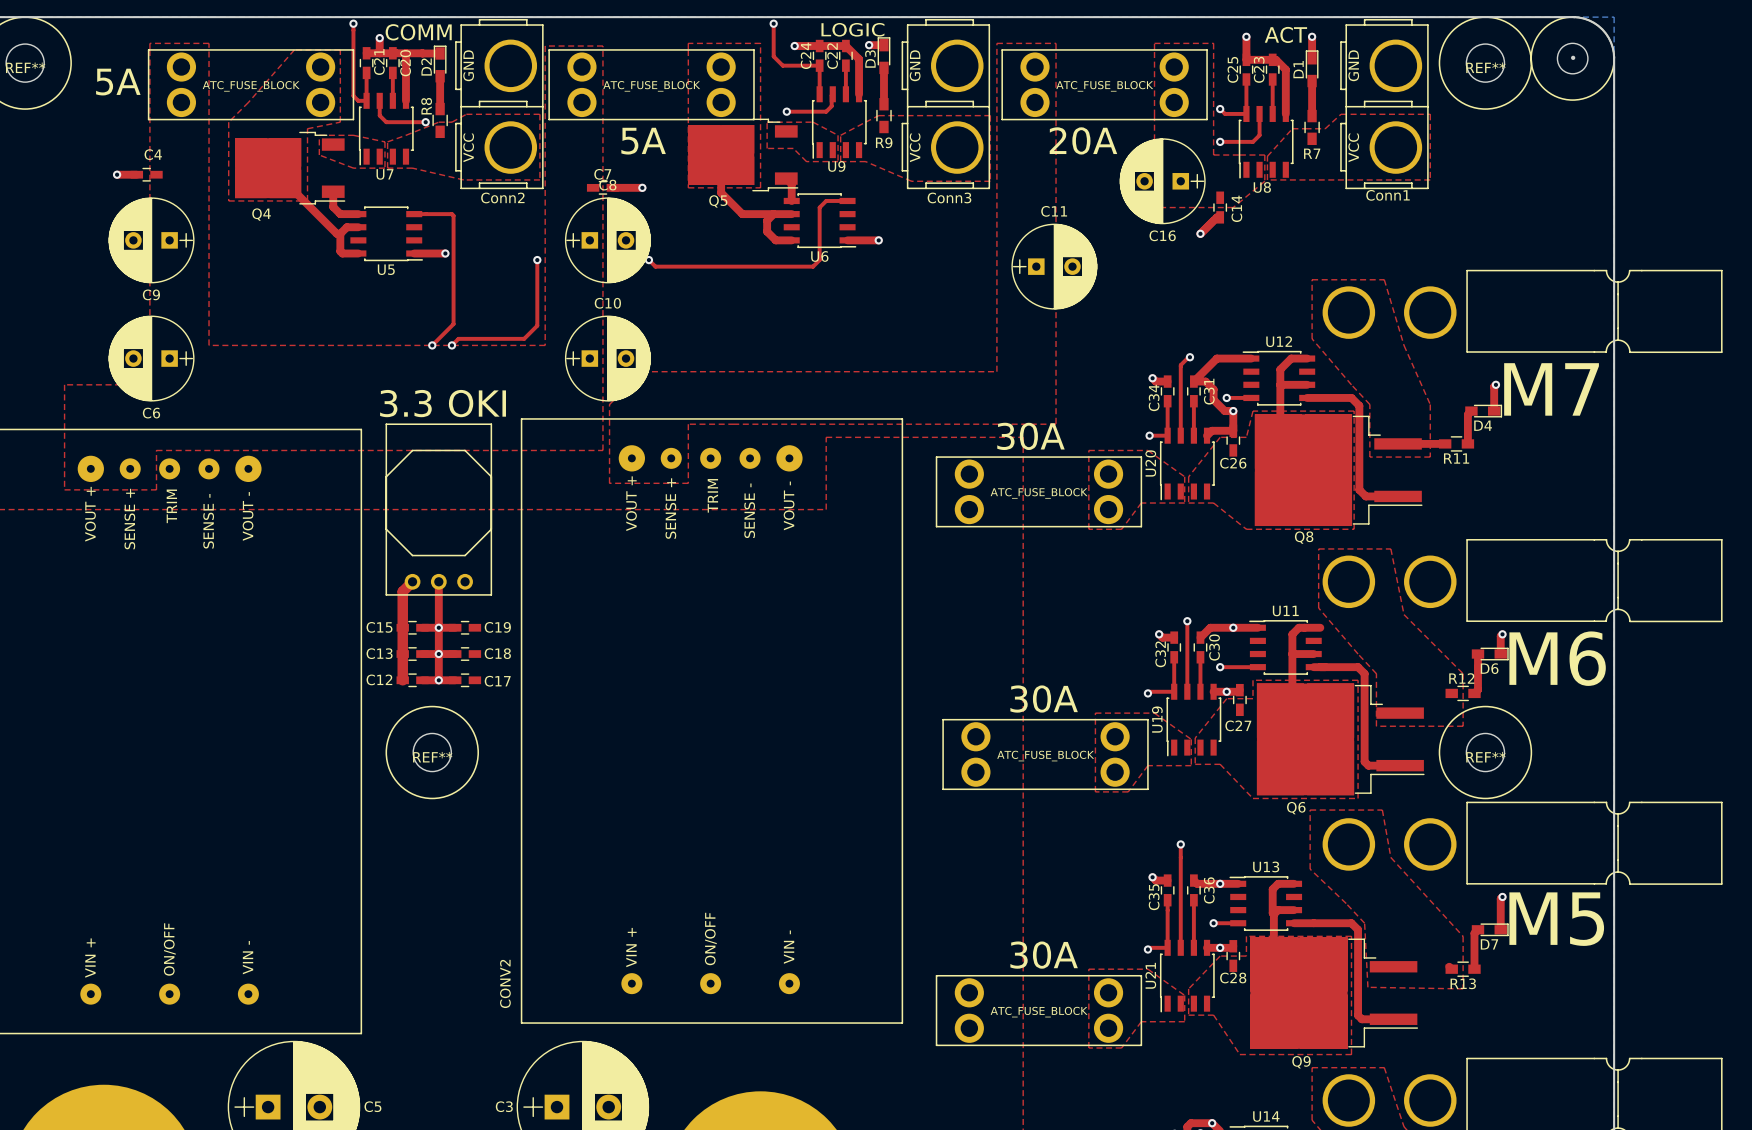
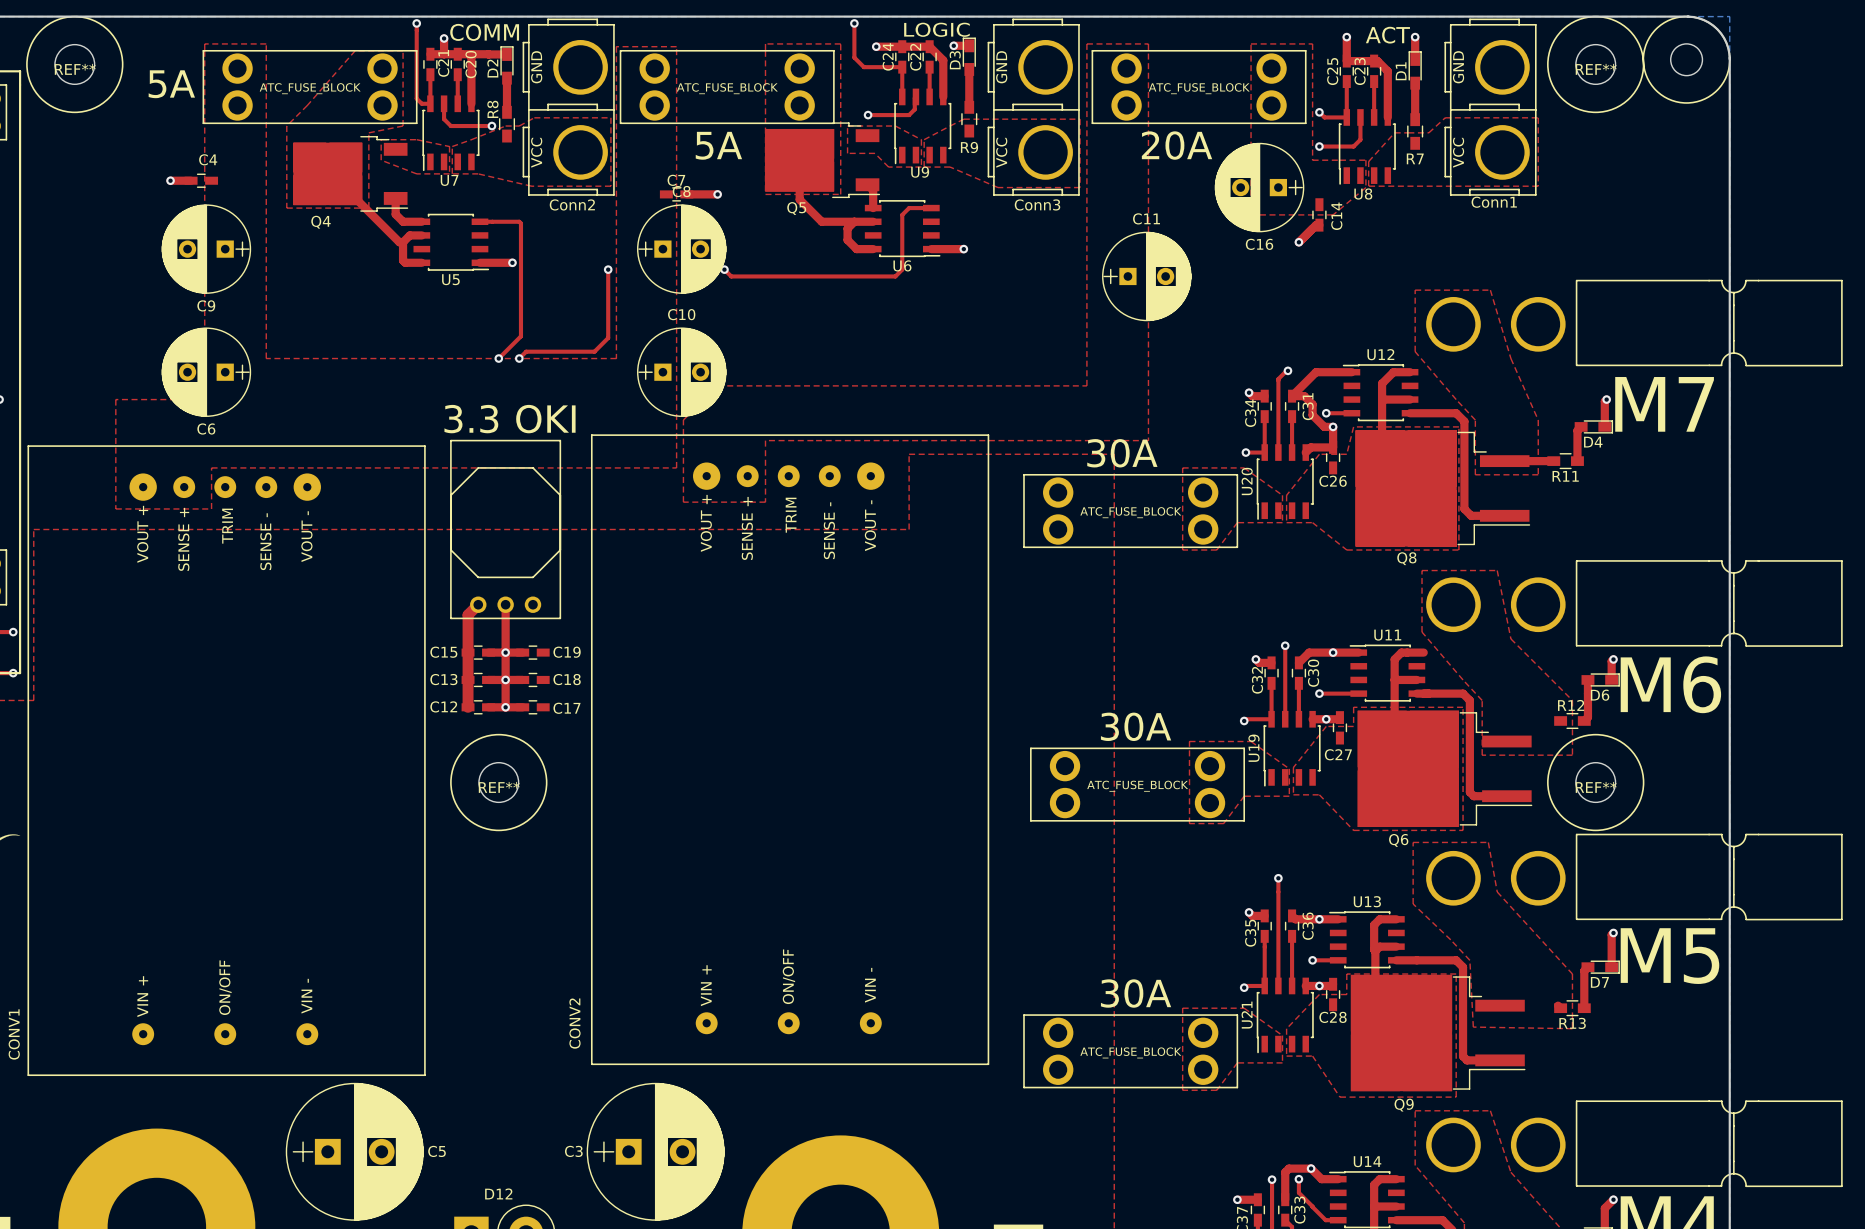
round board edge: [1571, 55, 1576, 60] -> none

